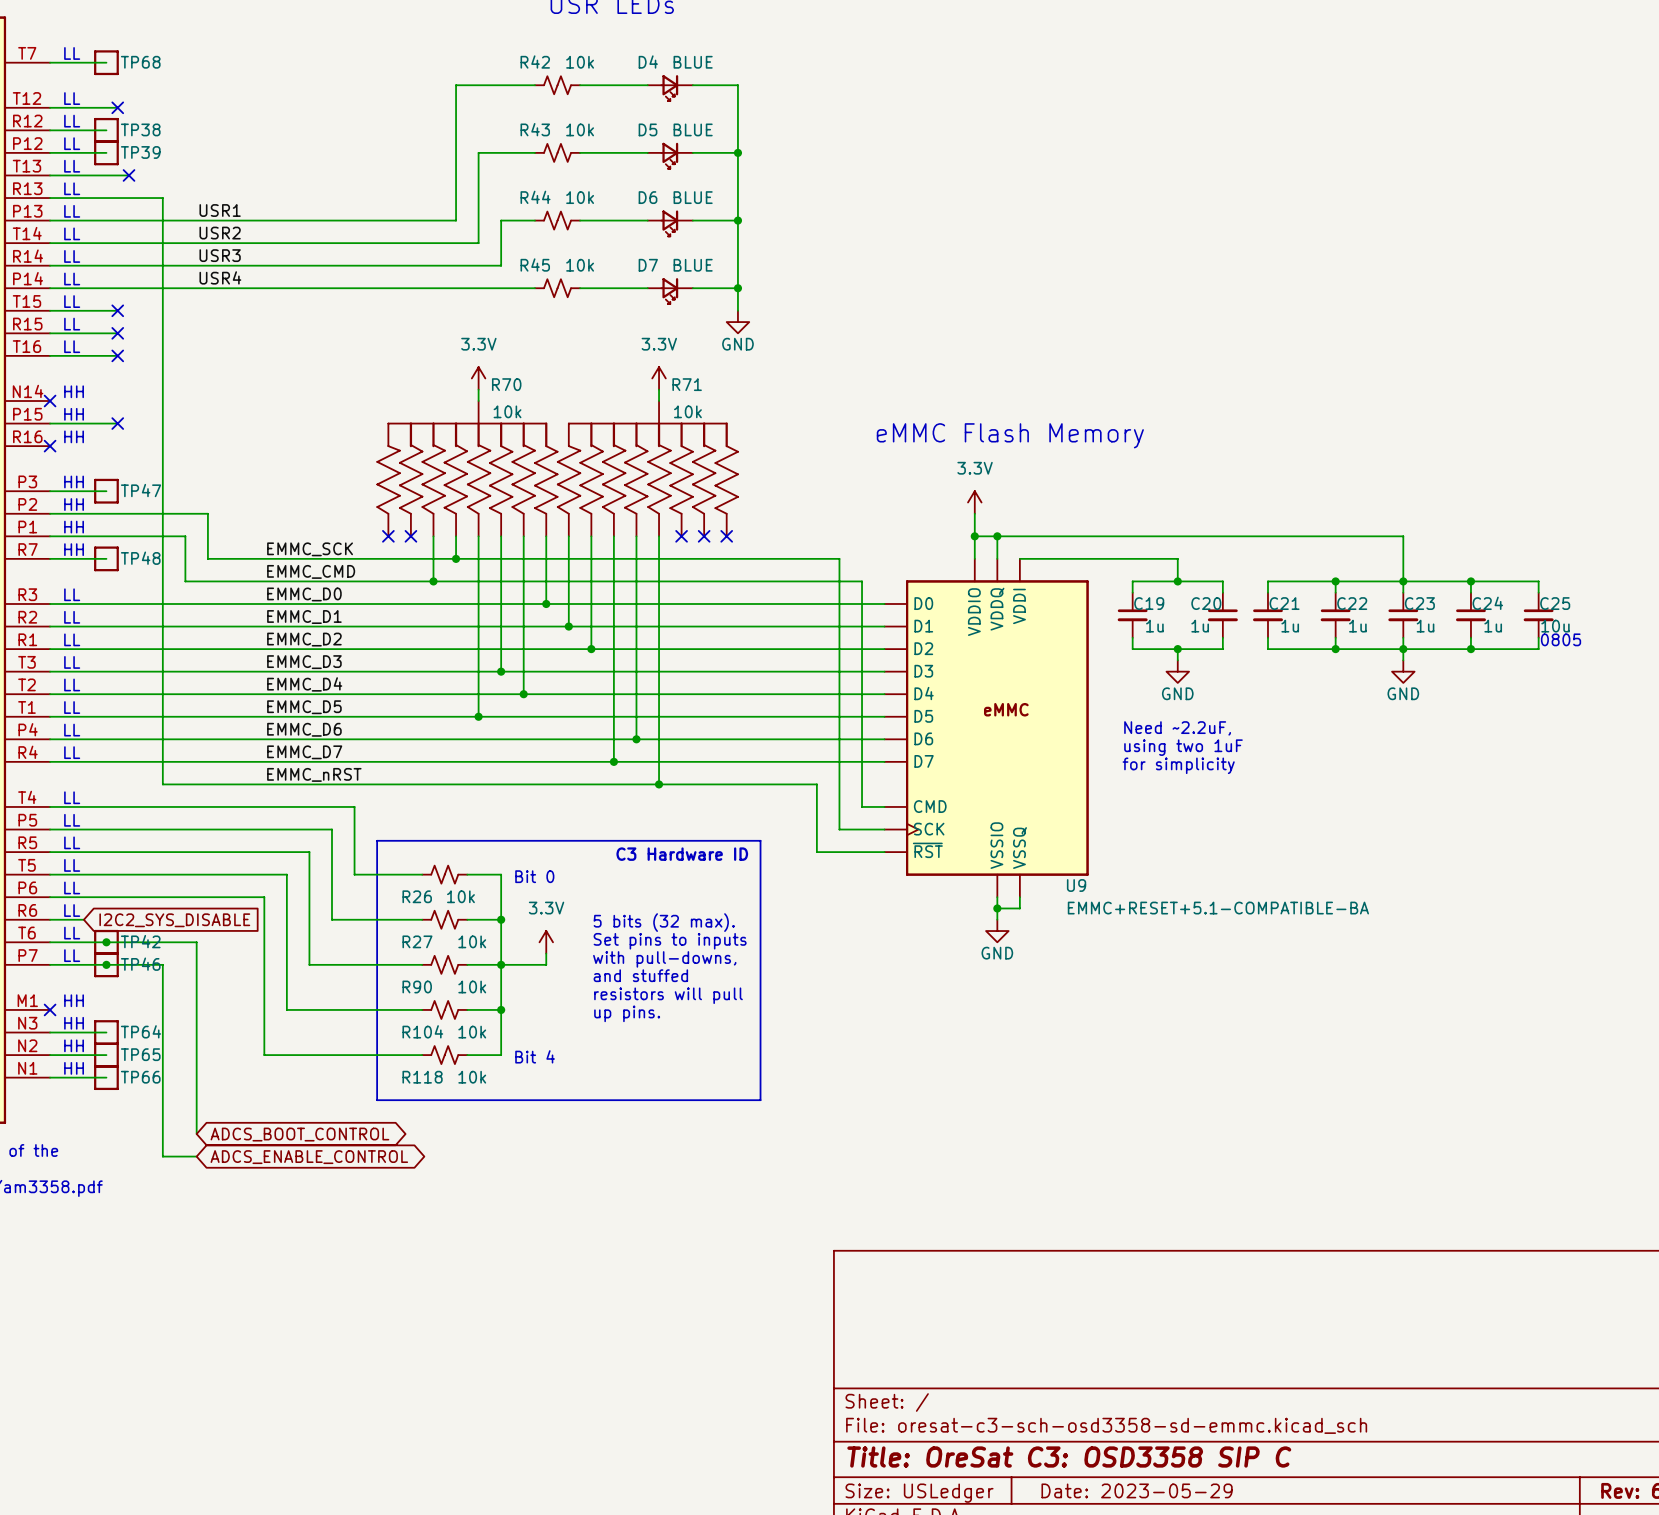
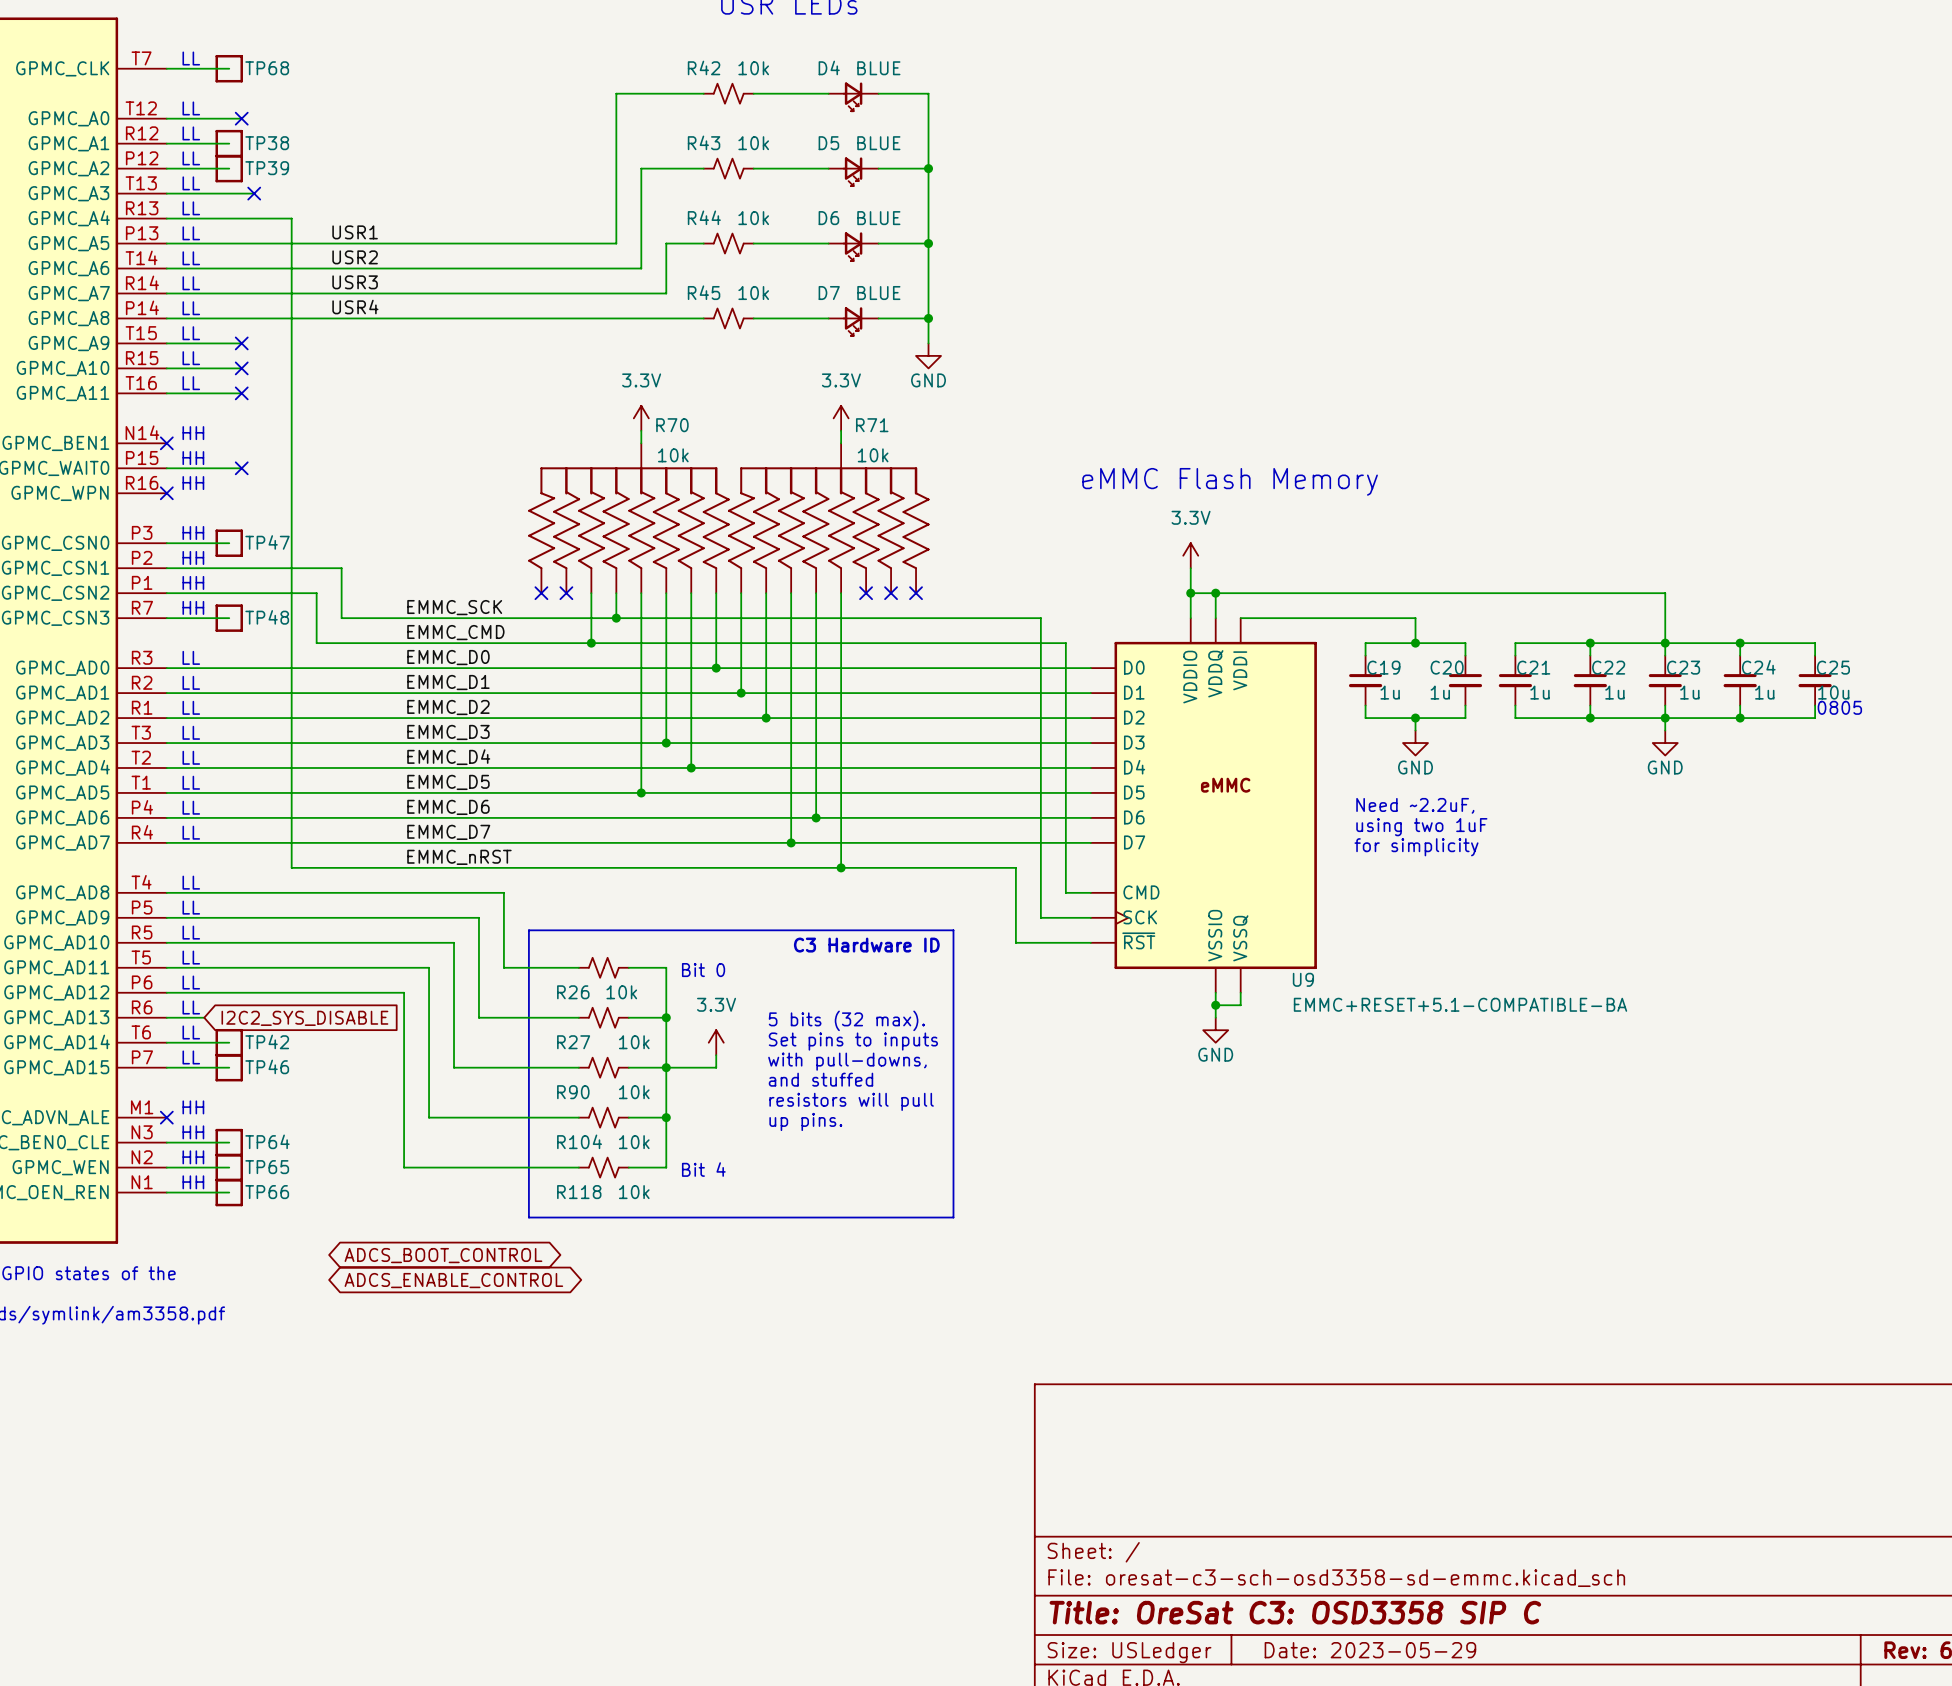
wire: (106, 942) (196, 942) (196, 1134) -> none
junction: (106, 942) -> none
wire: (106, 964) (162, 964) (162, 1156) (196, 1156) -> none
junction: (106, 964) -> none

